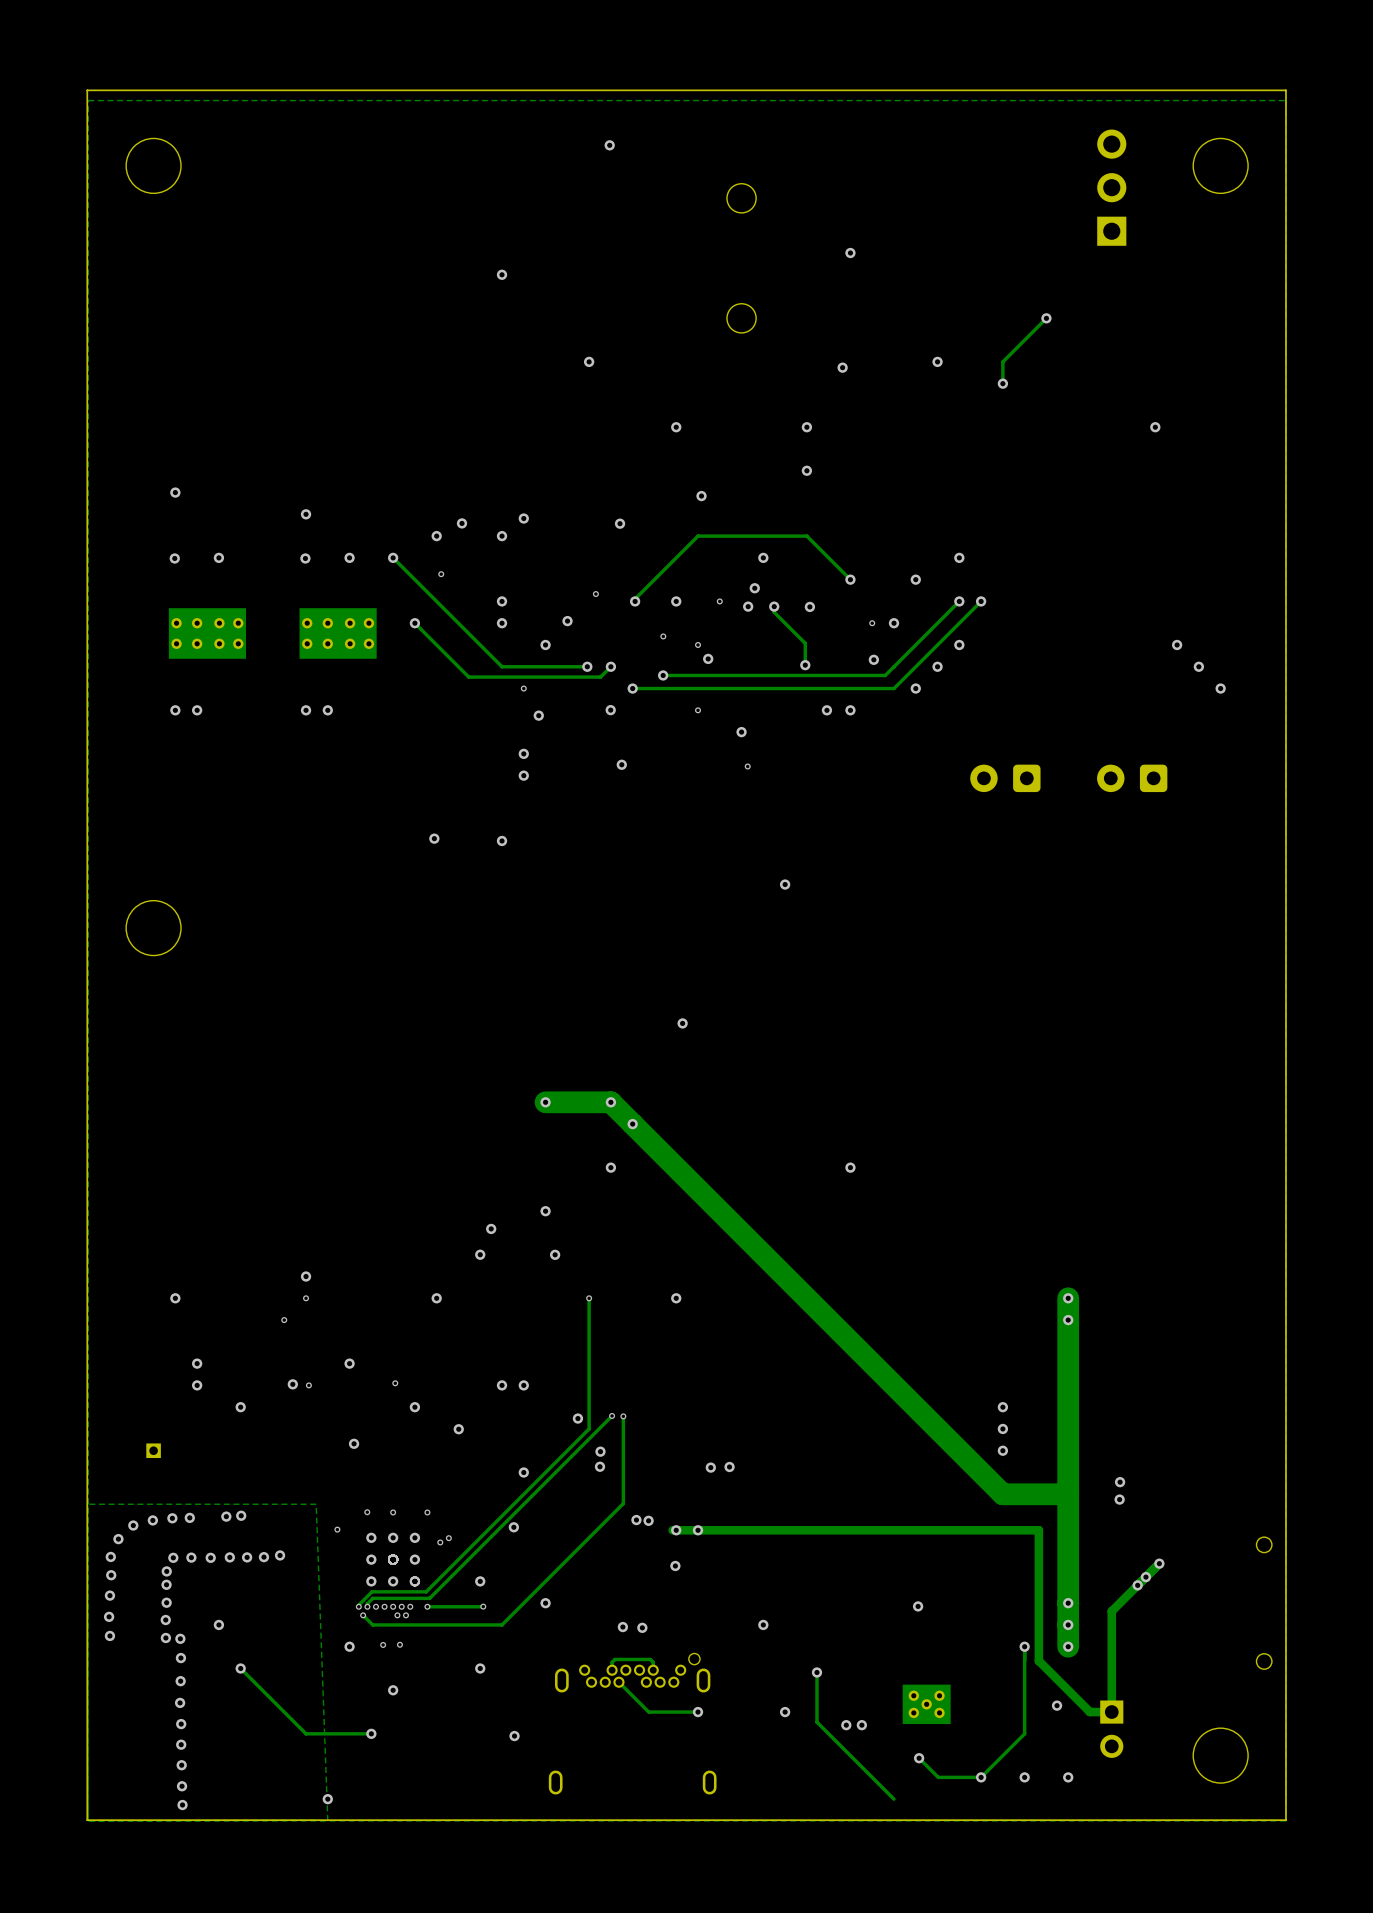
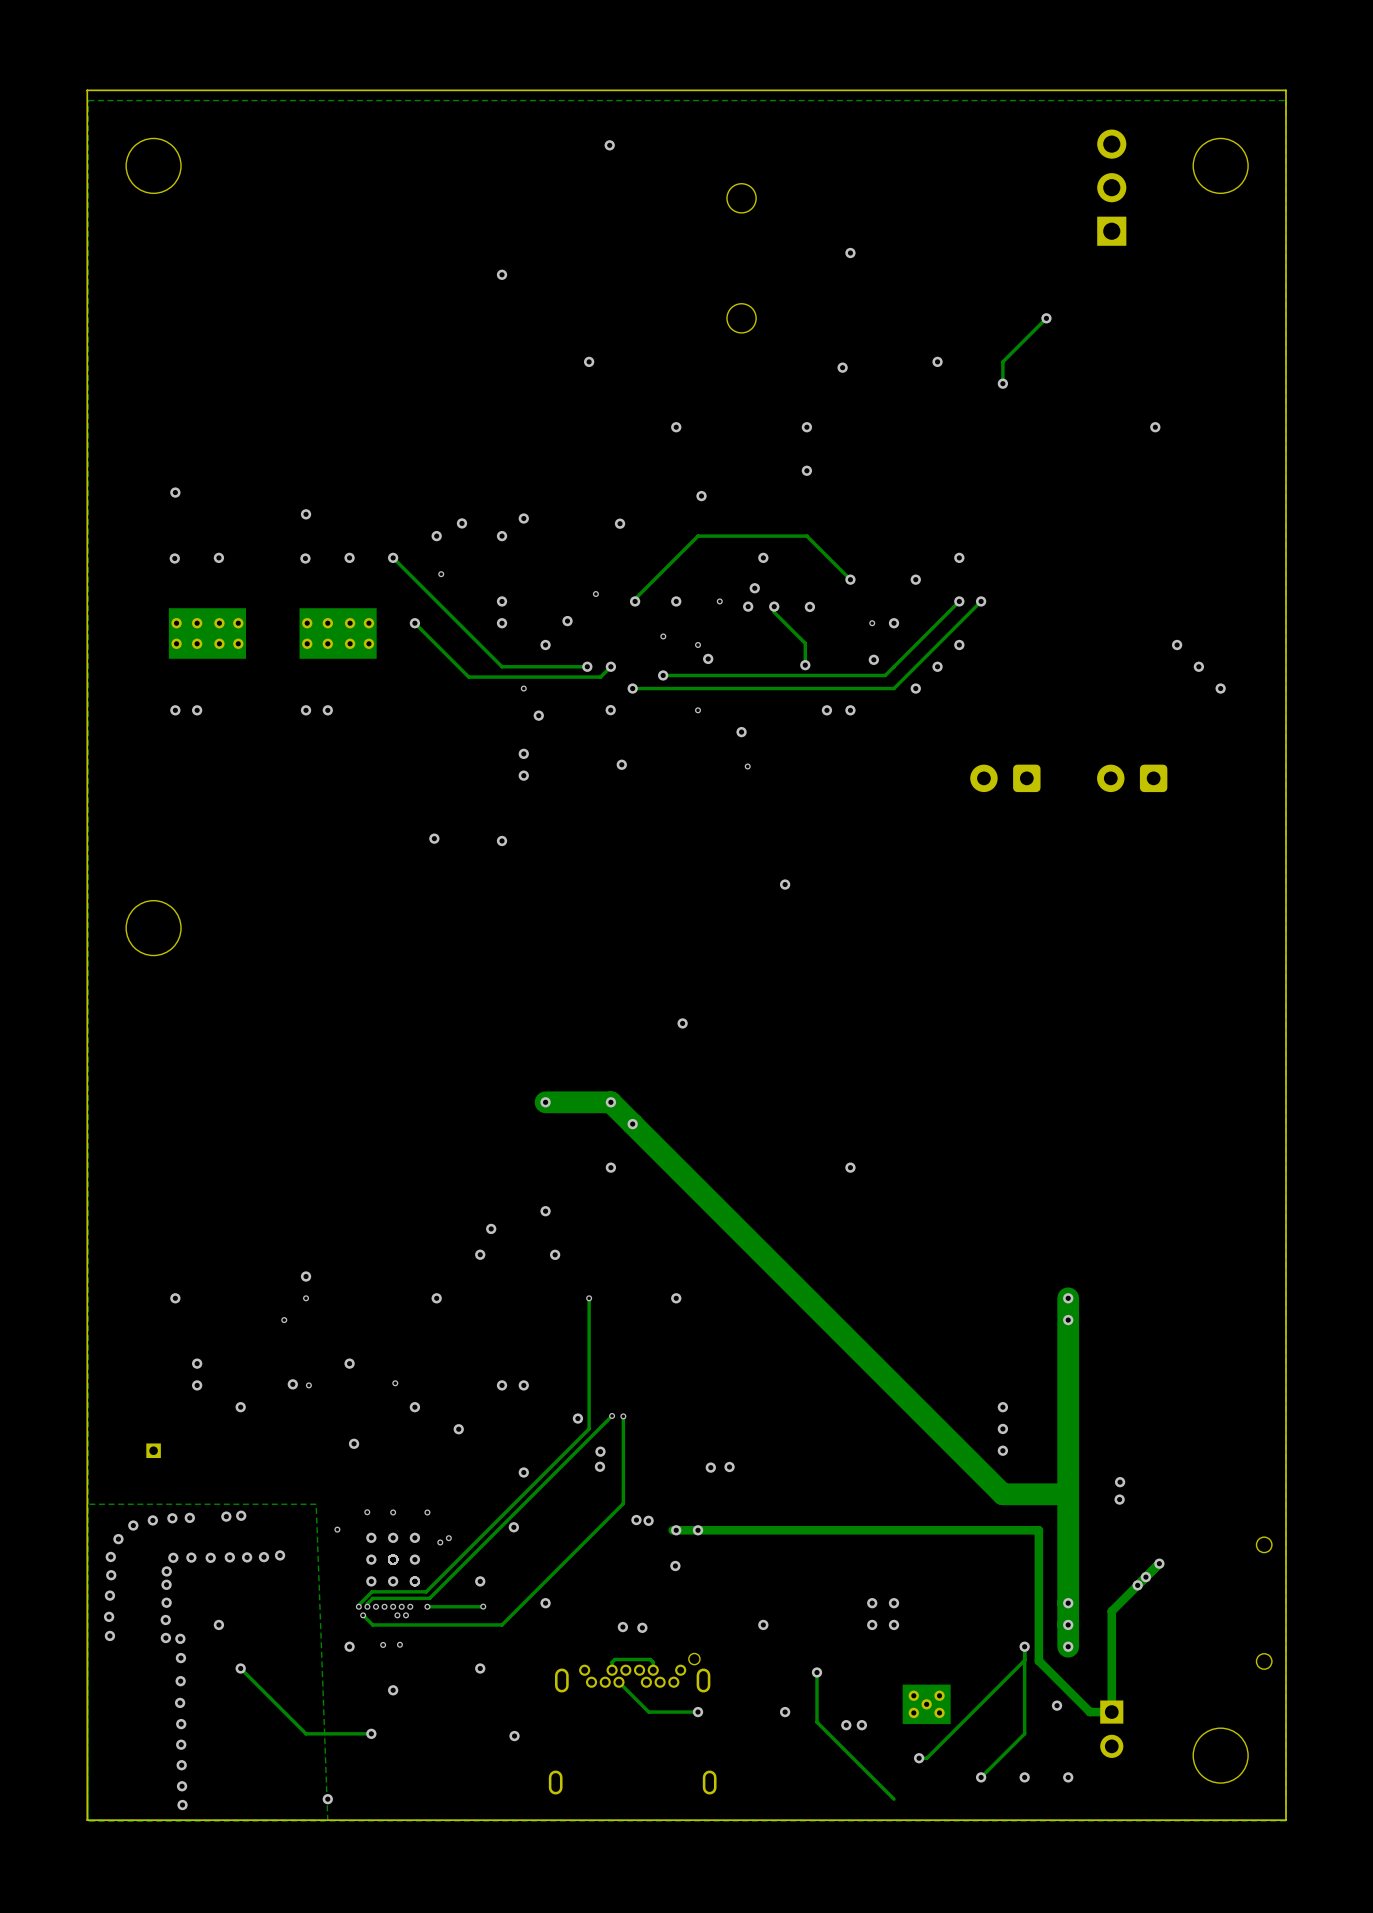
via: none -> (872, 1603)
via: none -> (894, 1603)
via: (918, 1606) -> none
via: none -> (872, 1624)
via: none -> (894, 1624)
track: (919, 1758) (938, 1777) (981, 1777) -> (919, 1758) (926, 1758) (1024, 1660)

